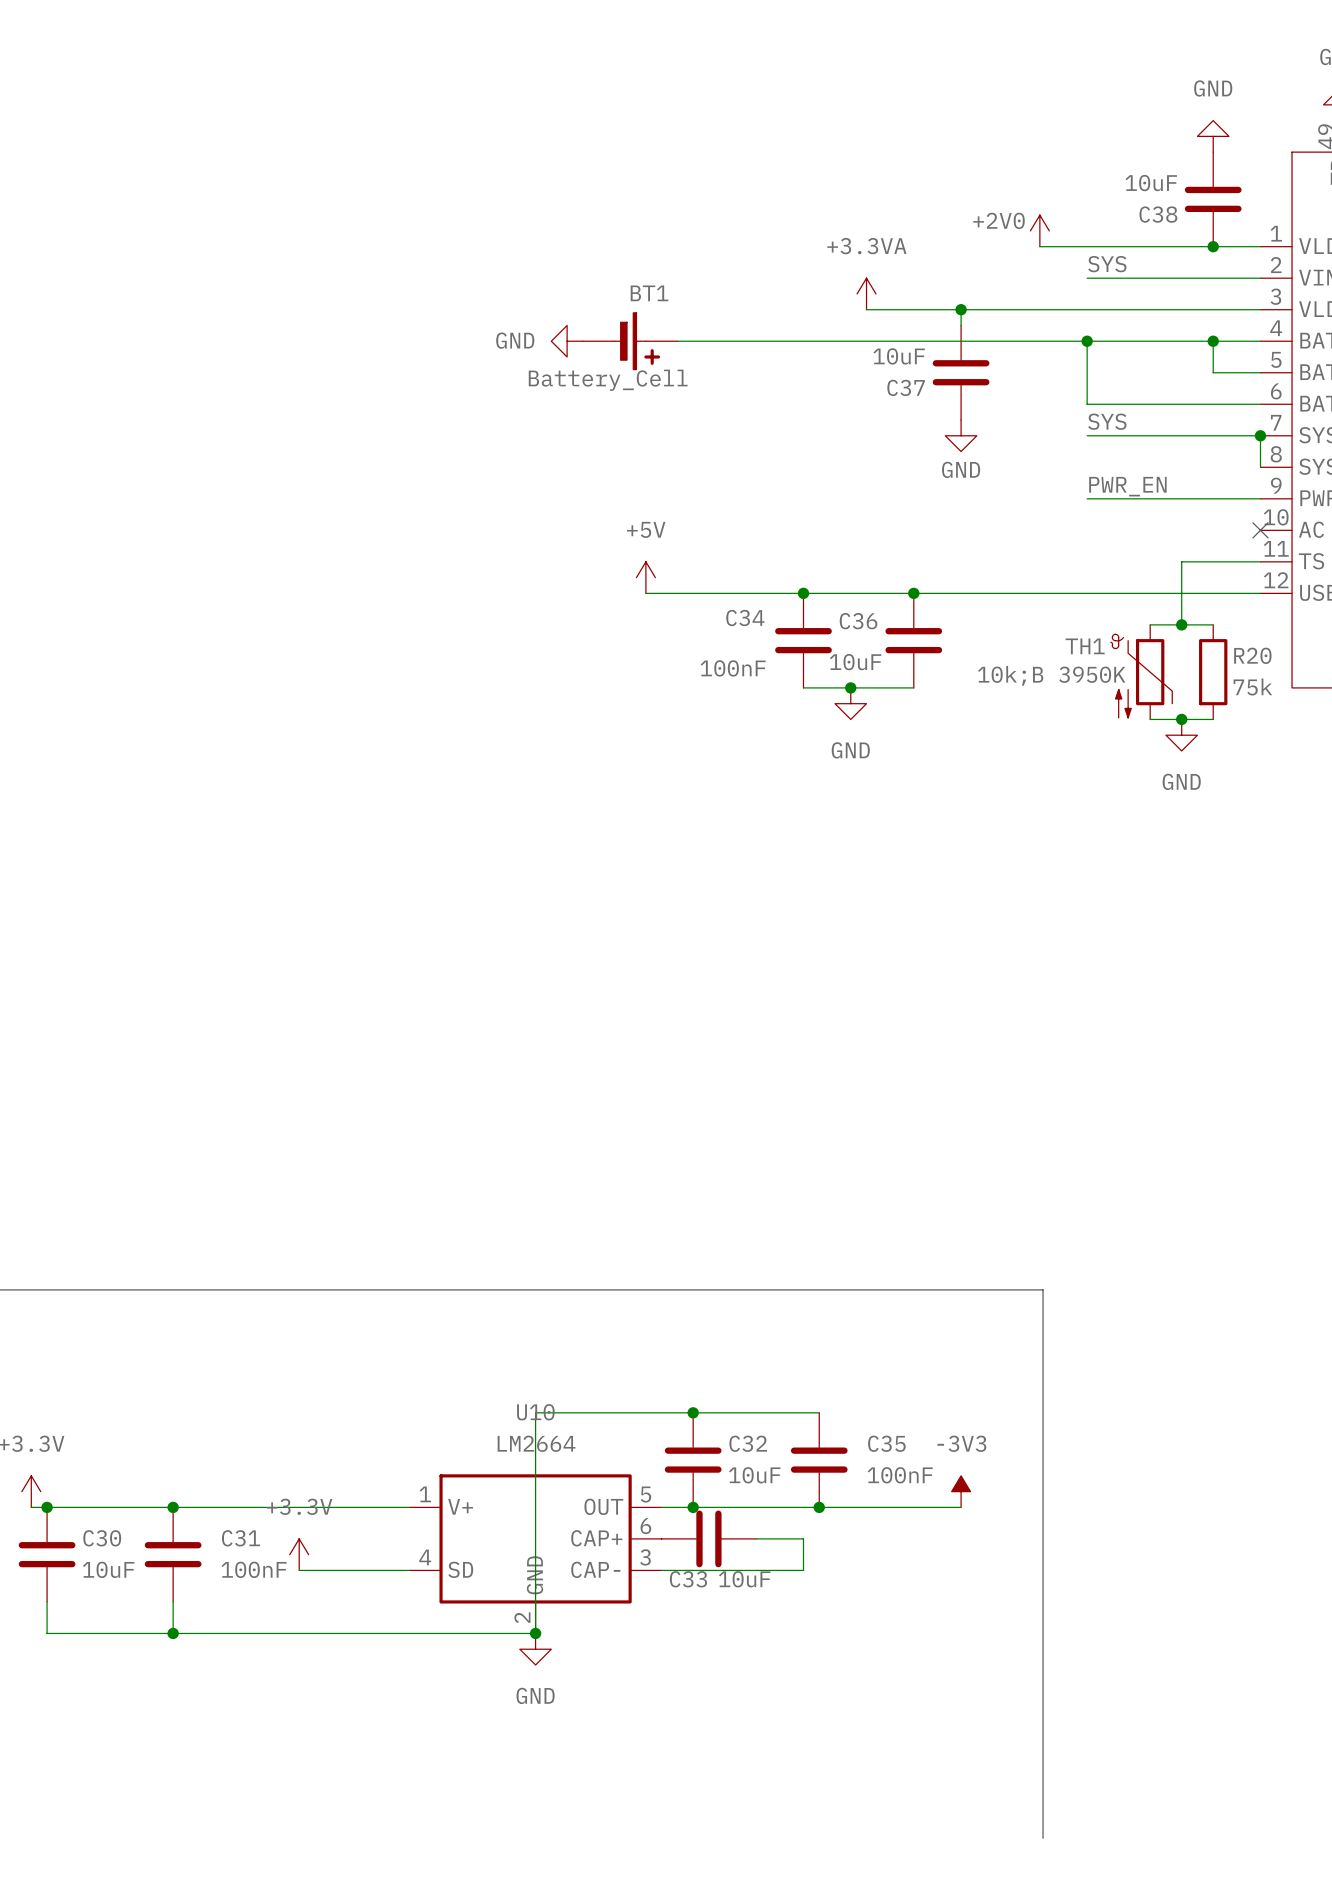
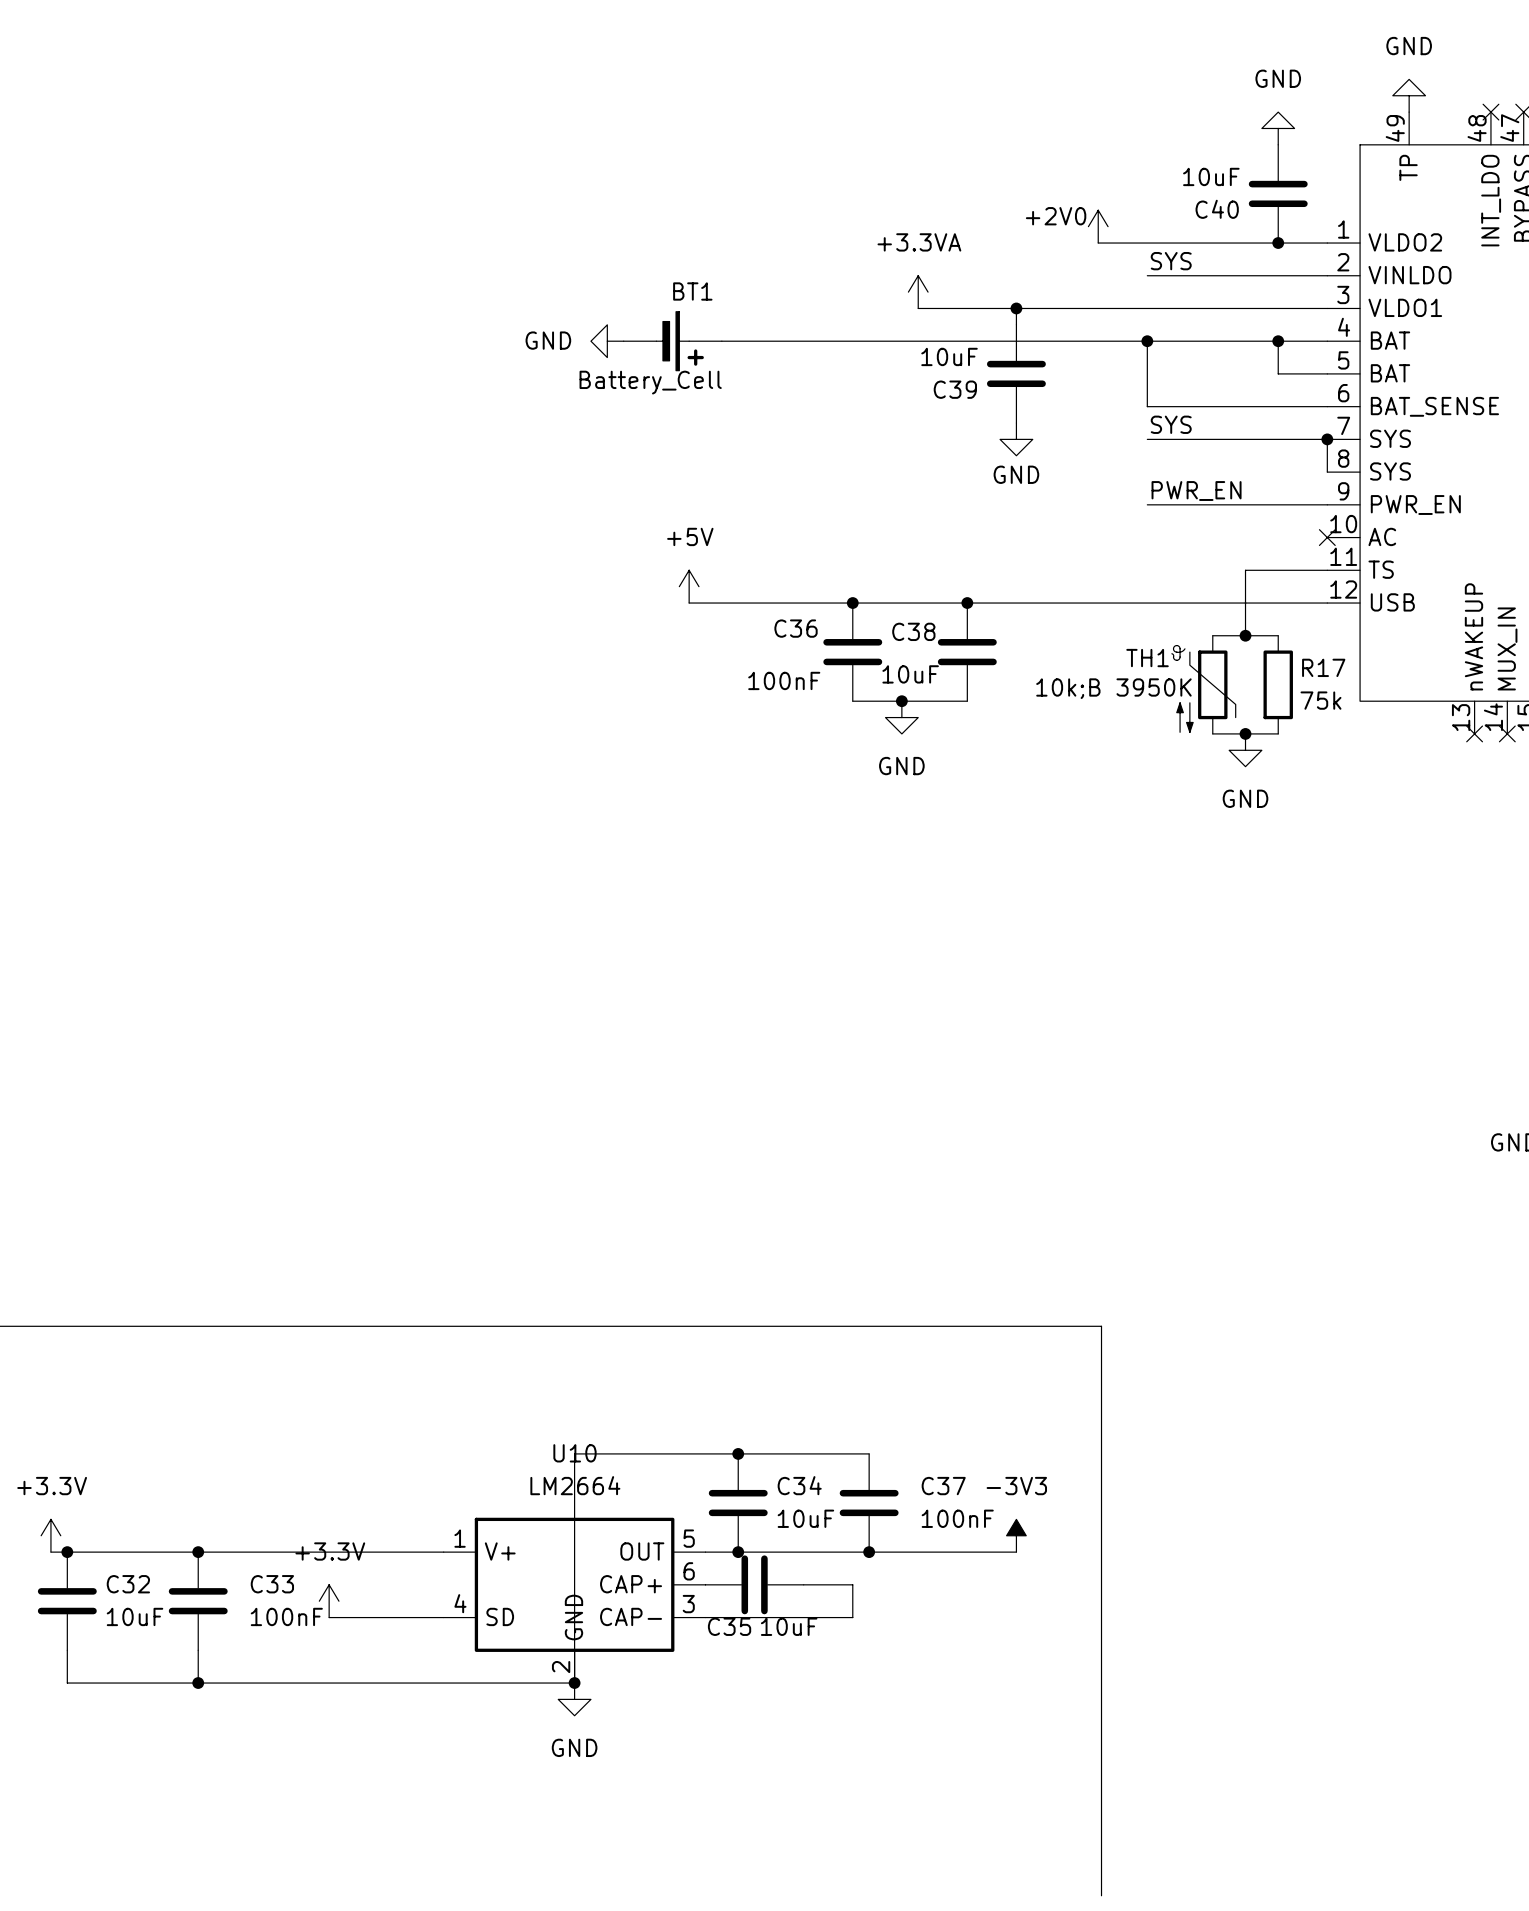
C38 name: C38 (1158, 214) -> C40 (1217, 209)
C37 name: C37 (906, 387) -> C39 (955, 389)
C34 name: C34 (745, 618) -> C36 (796, 628)
C36 name: C36 (858, 621) -> C38 (913, 631)
R20 name: R20 (1252, 655) -> R17 (1323, 667)
C32 name: C32 (748, 1443) -> C34 (799, 1485)
C35 name: C35 (886, 1443) -> C37 (943, 1486)
C30 name: C30 (102, 1538) -> C32 (128, 1584)
C31 name: C31 (240, 1538) -> C33 (272, 1584)
C33 name: C33 (688, 1579) -> C35 (729, 1626)

